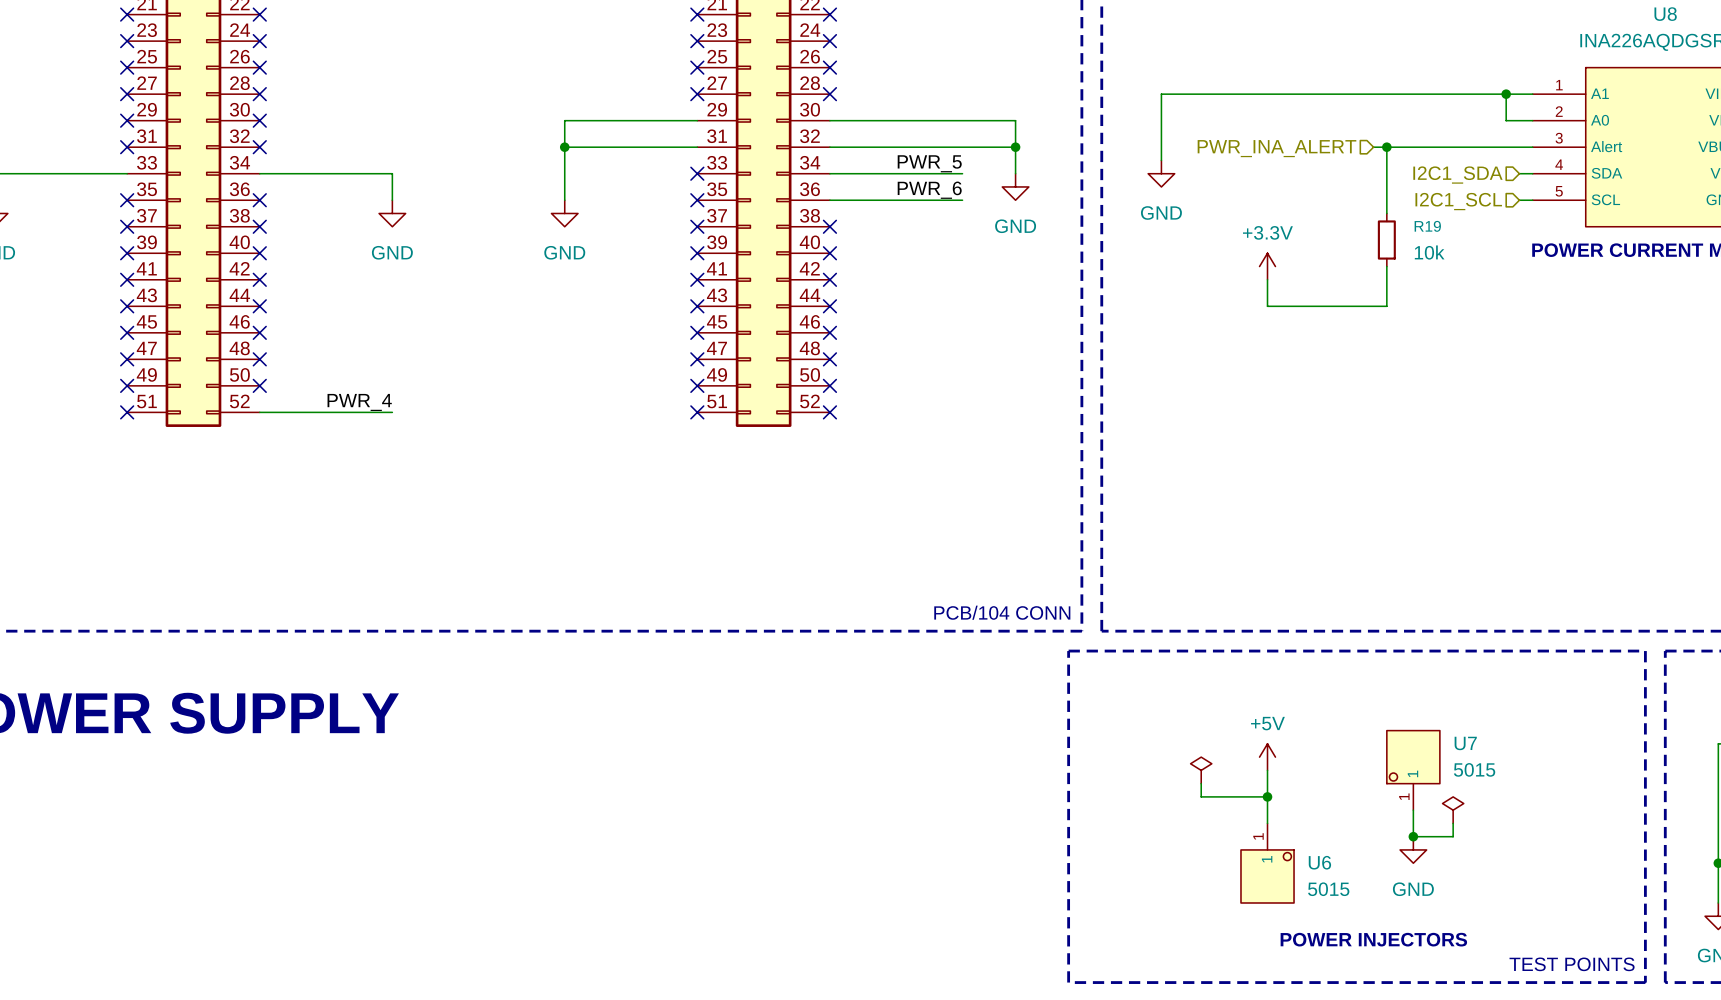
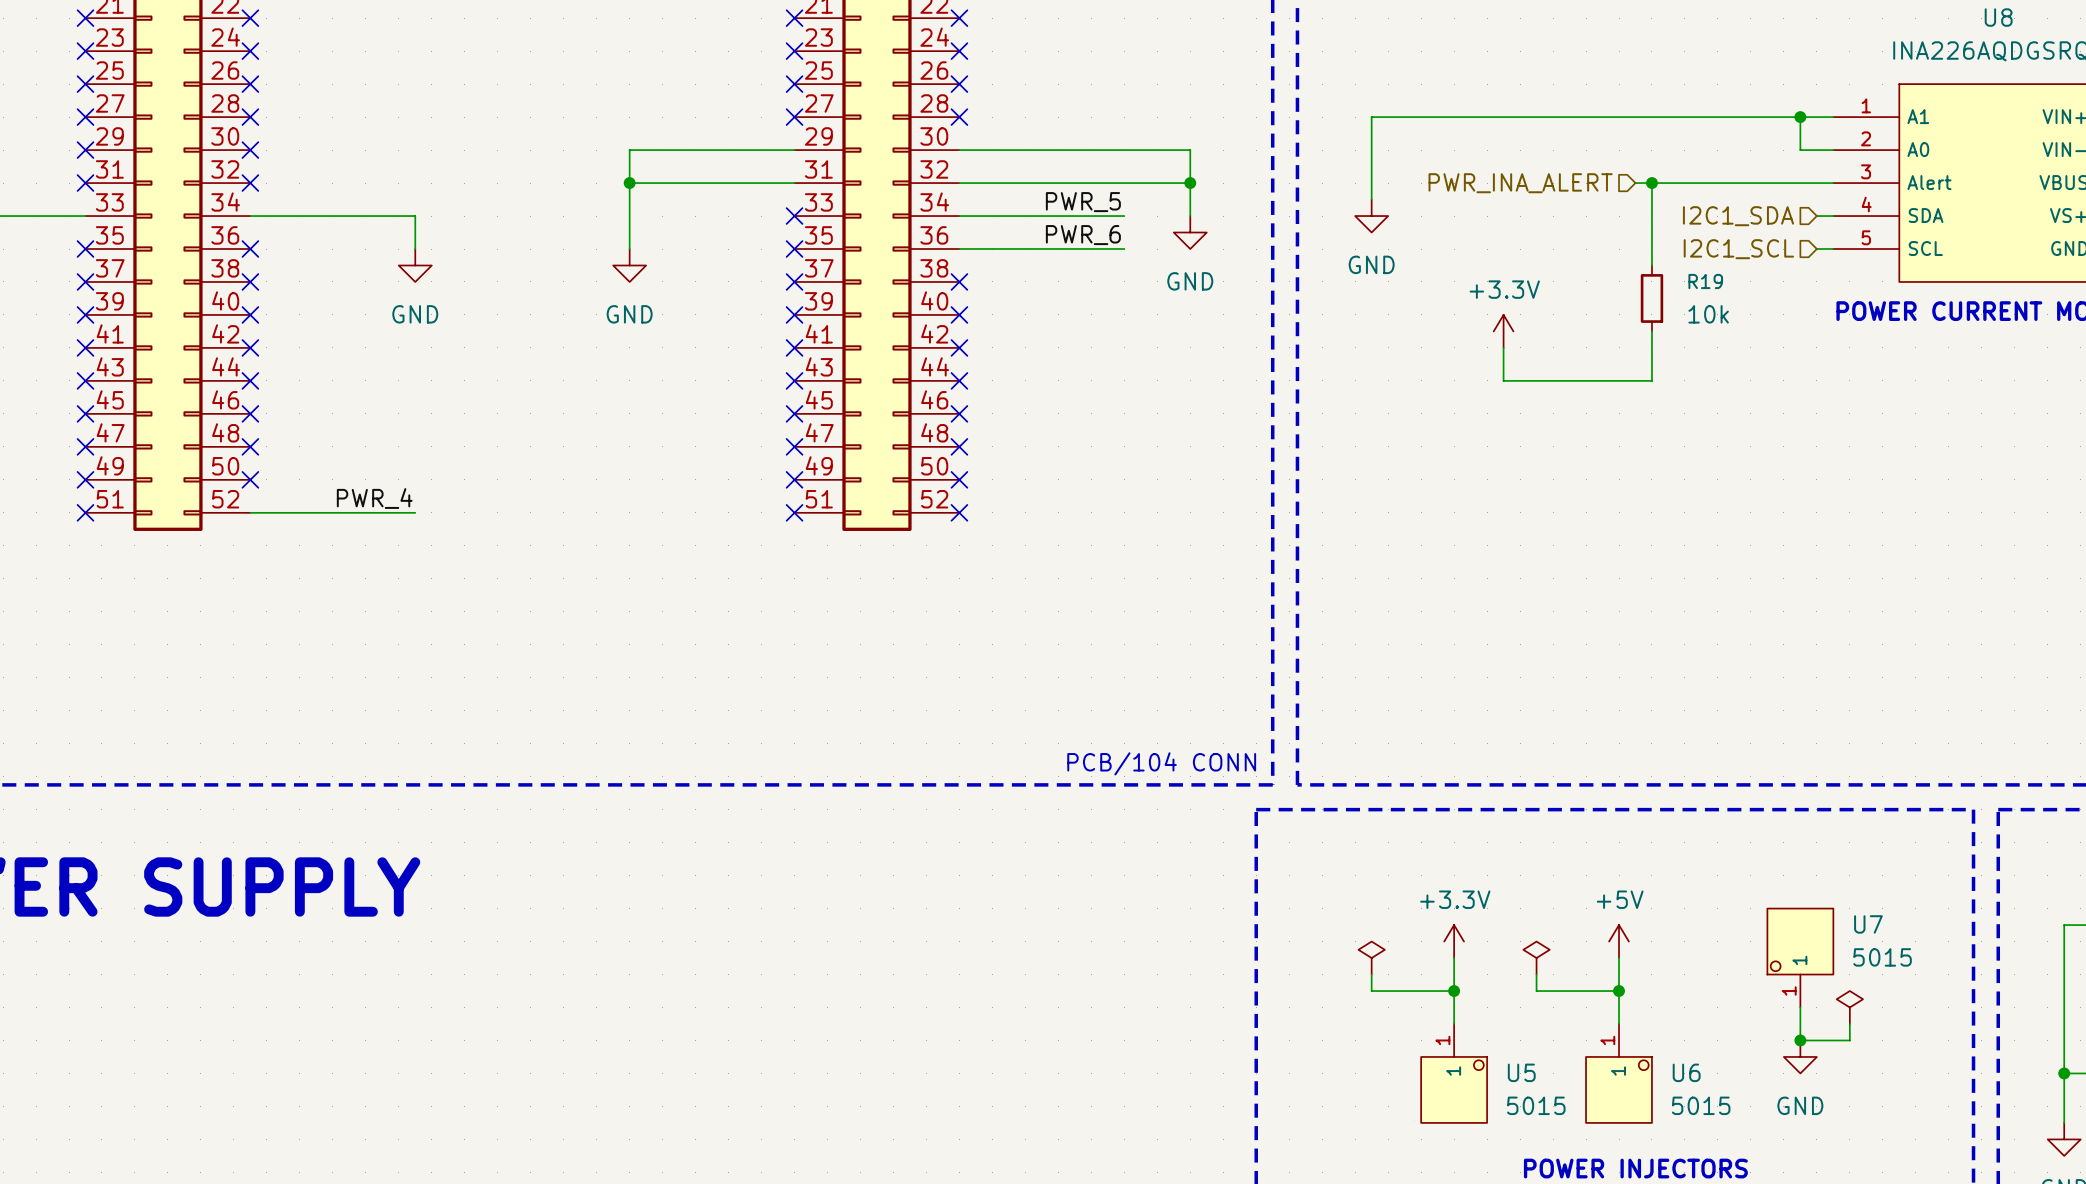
power symbol: none -> +3.3V (1454, 941)
power symbol position: +5V (1267, 757) -> +5V (1619, 941)
power symbol position: (1201, 770) -> (1371, 958)
wire: none -> (1454, 958) (1454, 1023)
wire: (1267, 770) (1267, 823) -> (1619, 958) (1619, 1023)
power symbol: none -> (1536, 958)
U7 position: (1413, 770) -> (1800, 958)
wire: (1201, 783) (1201, 796) -> (1371, 974) (1371, 991) (1421, 991)
wire: none -> (1536, 974) (1536, 991) (1619, 991)
wire: (1227, 796) (1267, 796) -> none
junction position: (1267, 796) -> (1454, 991)
junction: none -> (1619, 991)
wire: (1413, 810) (1413, 836) (1453, 836) (1453, 823) -> (1800, 1007) (1800, 1040) (1849, 1040) (1849, 1023)
power symbol: (1453, 810) -> none
power symbol: none -> (1849, 1007)
junction: (1413, 836) -> none
junction: none -> (1800, 1040)
power symbol position: GND (1413, 849) -> GND (1800, 1056)
U5: none -> 5015 (1454, 1073)
U6 position: (1267, 863) -> (1619, 1073)

